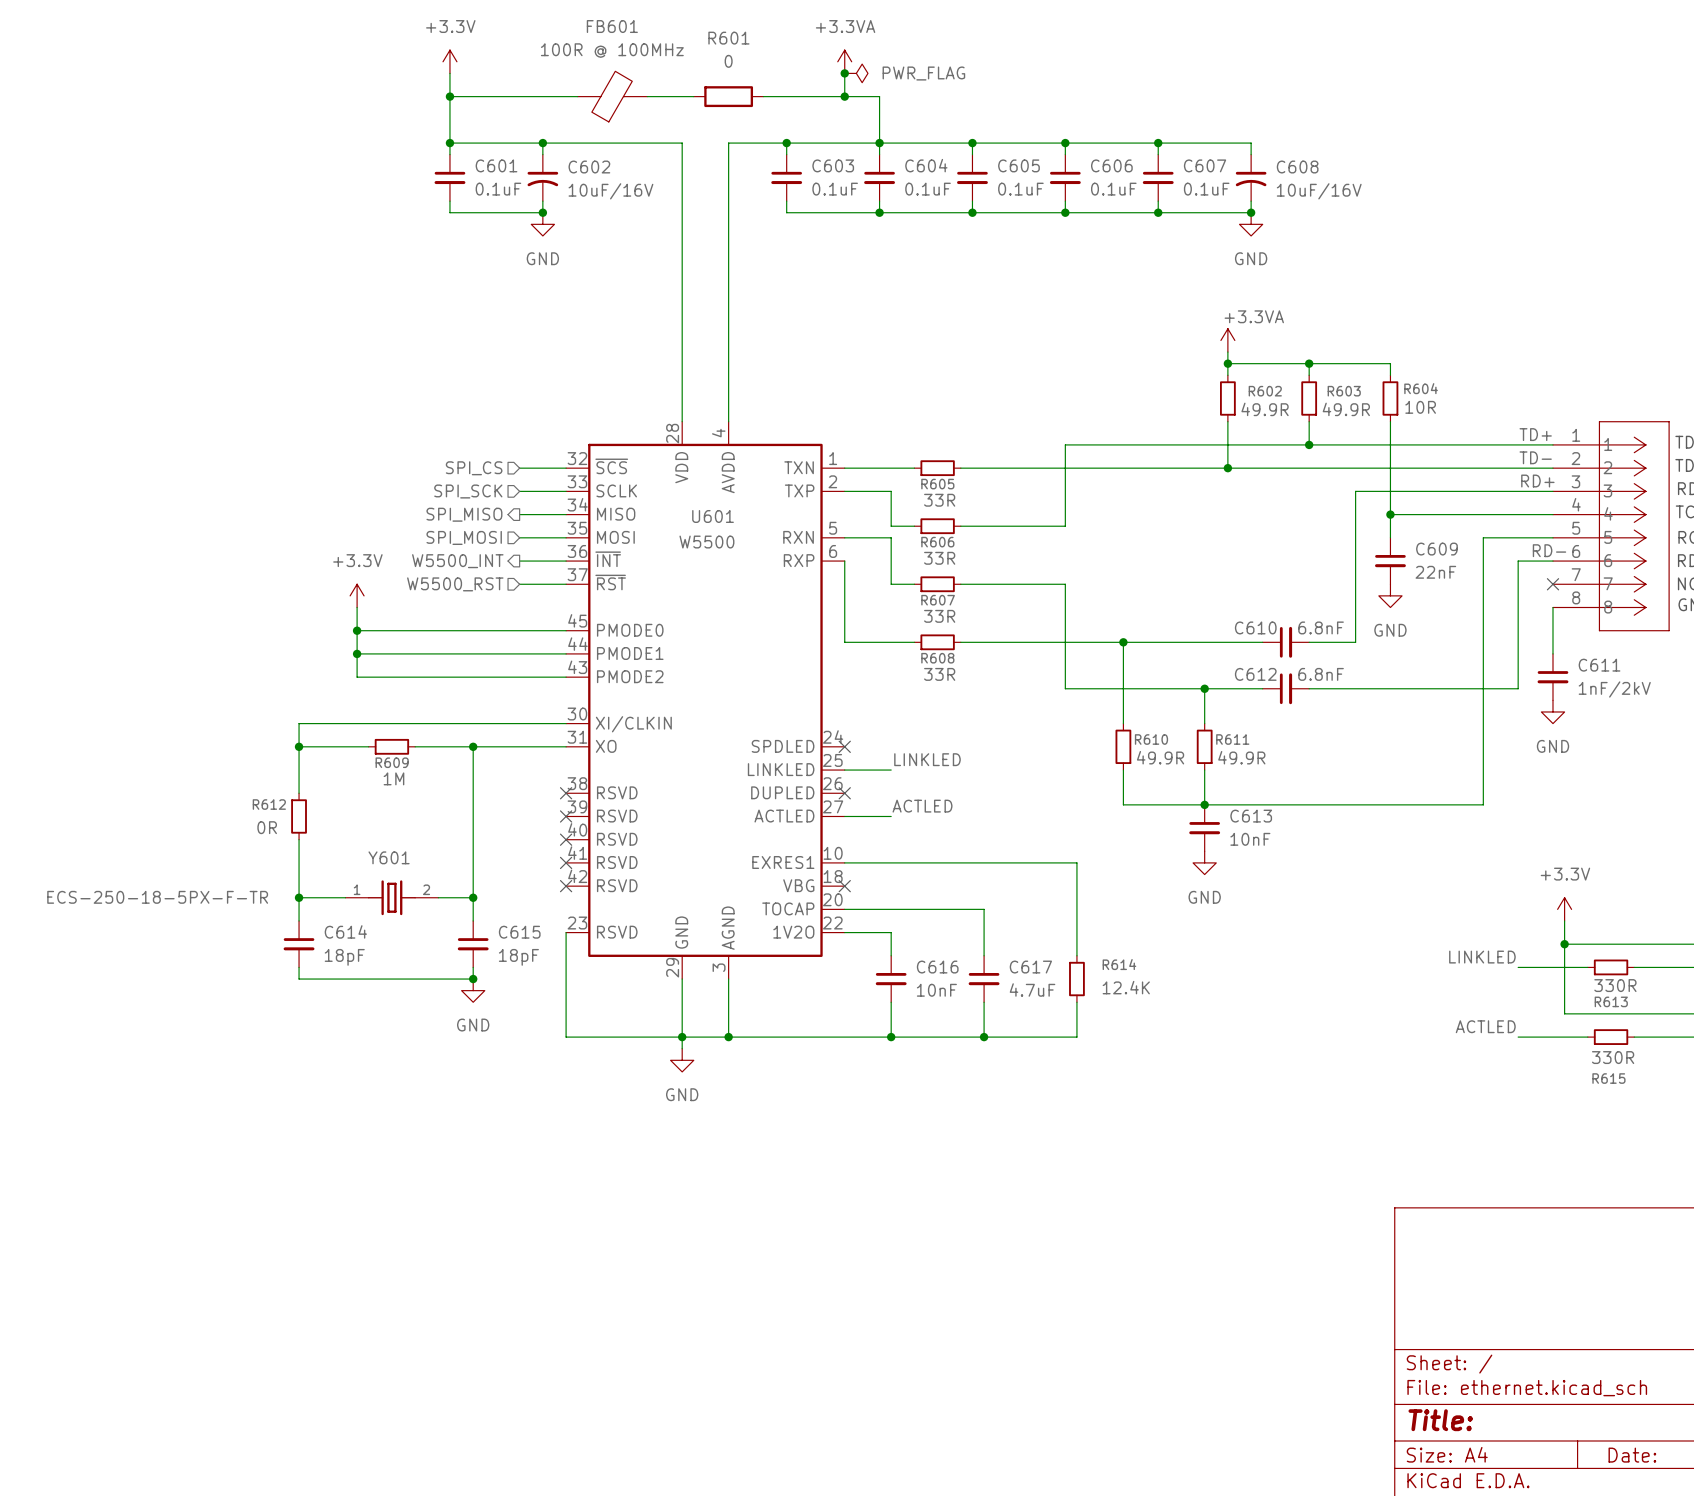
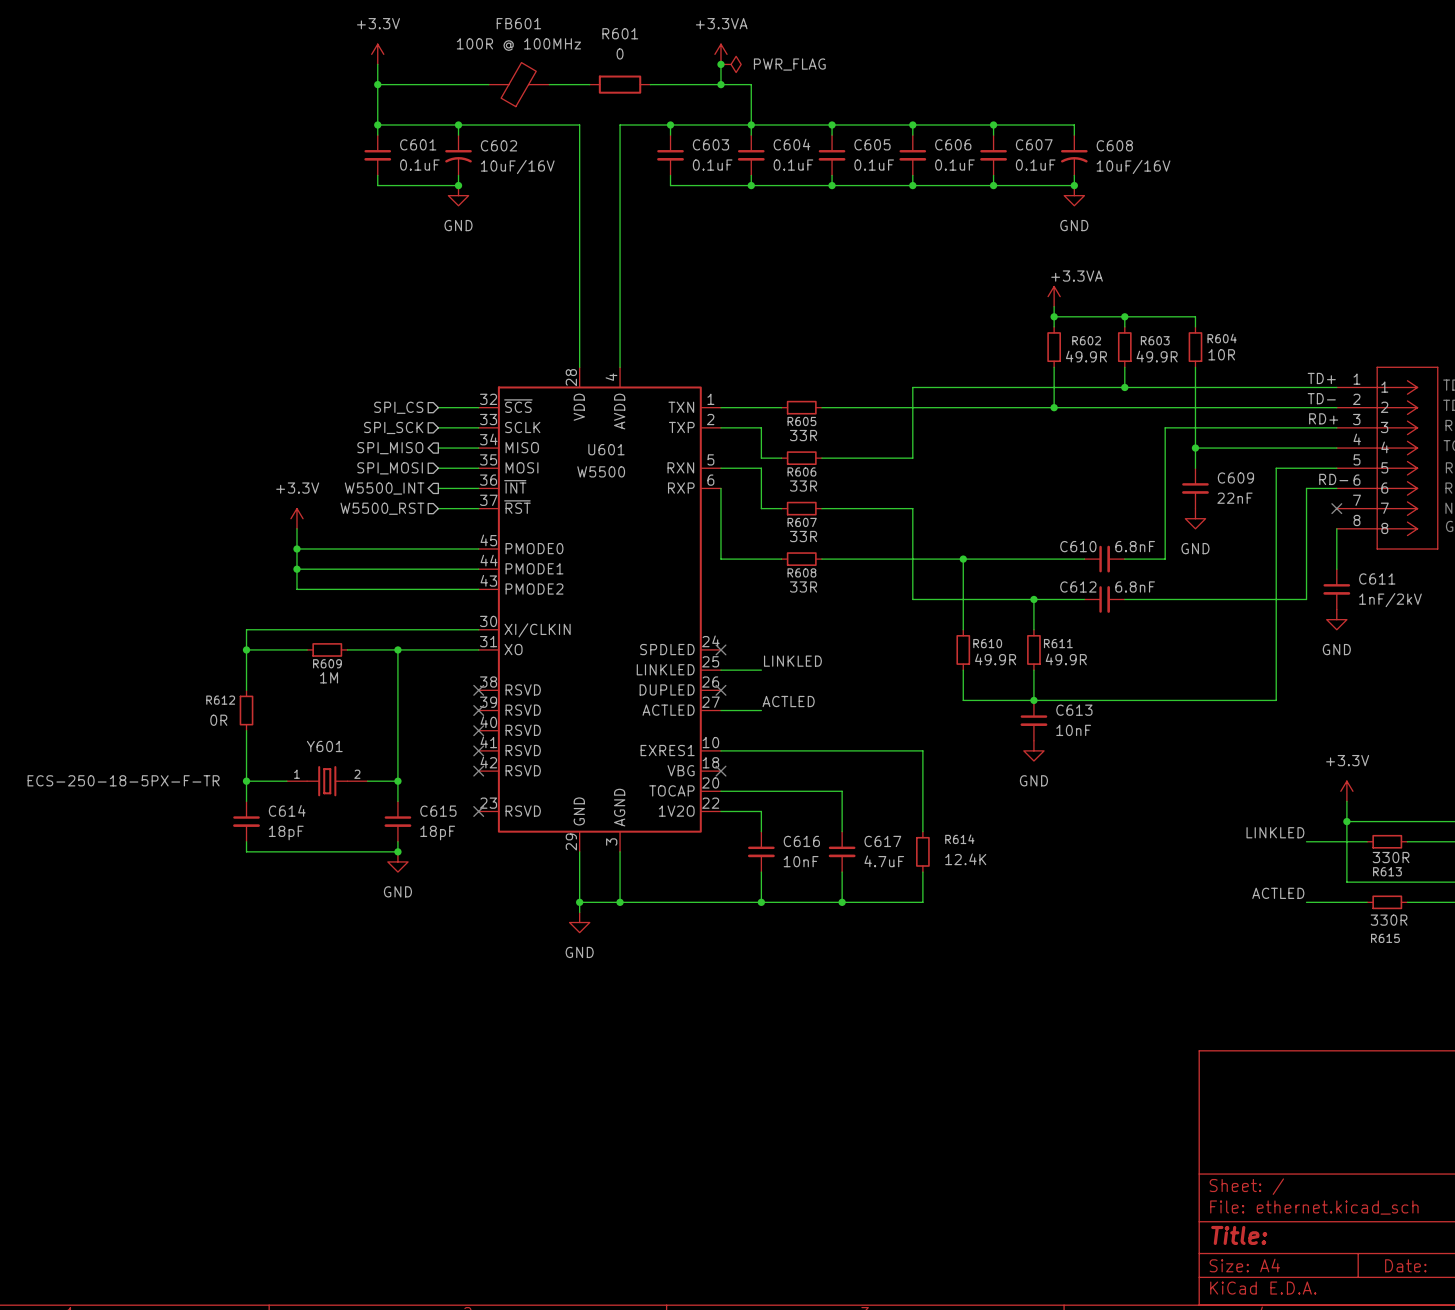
wire: (566, 932) (566, 1037) (682, 1037) -> none
no-connect mark: none -> (478, 811)

